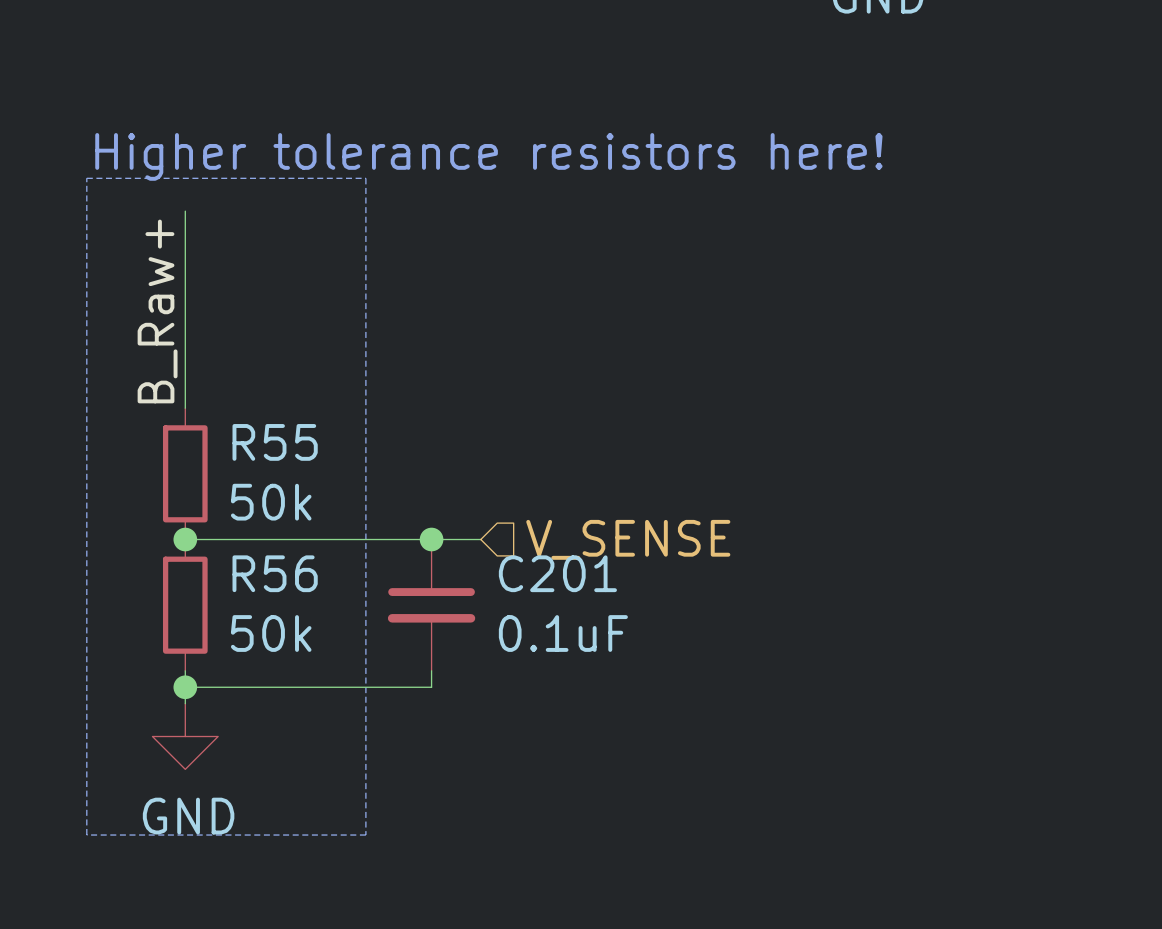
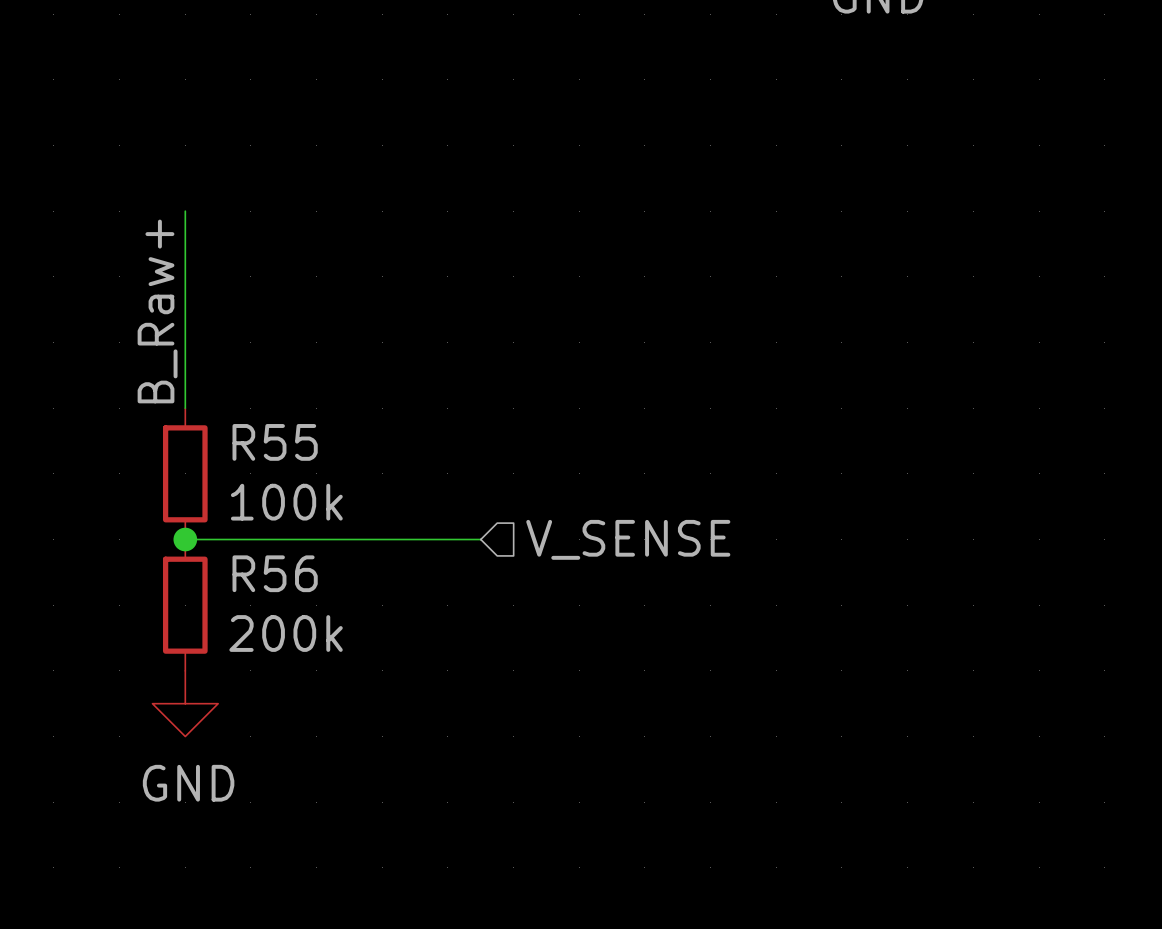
text: Higher tolerance resistors here! (488, 156) -> none
line: (86, 178) (365, 178) (365, 835) (86, 835) (86, 178) -> none
R55 value: 50k (271, 502) -> 100k (286, 502)
junction: (431, 539) -> none
C201: 0.1uF (431, 605) -> none
R56 value: 50k (271, 633) -> 200k (286, 633)
wire: (431, 670) (431, 687) (185, 687) -> none
junction: (185, 687) -> none
power symbol position: GND (185, 736) -> GND (185, 703)

